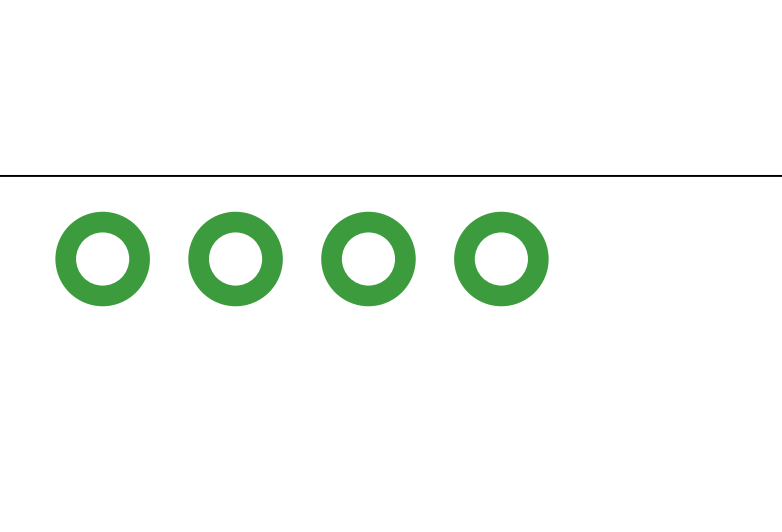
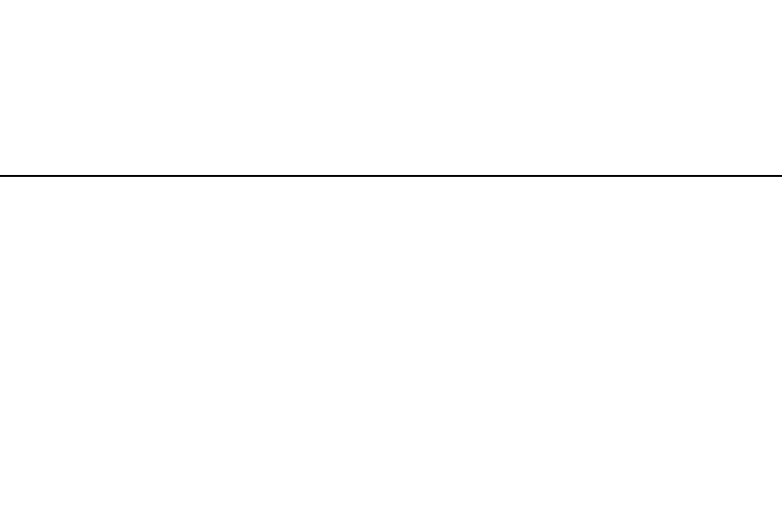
part: (302, 259) -> none

